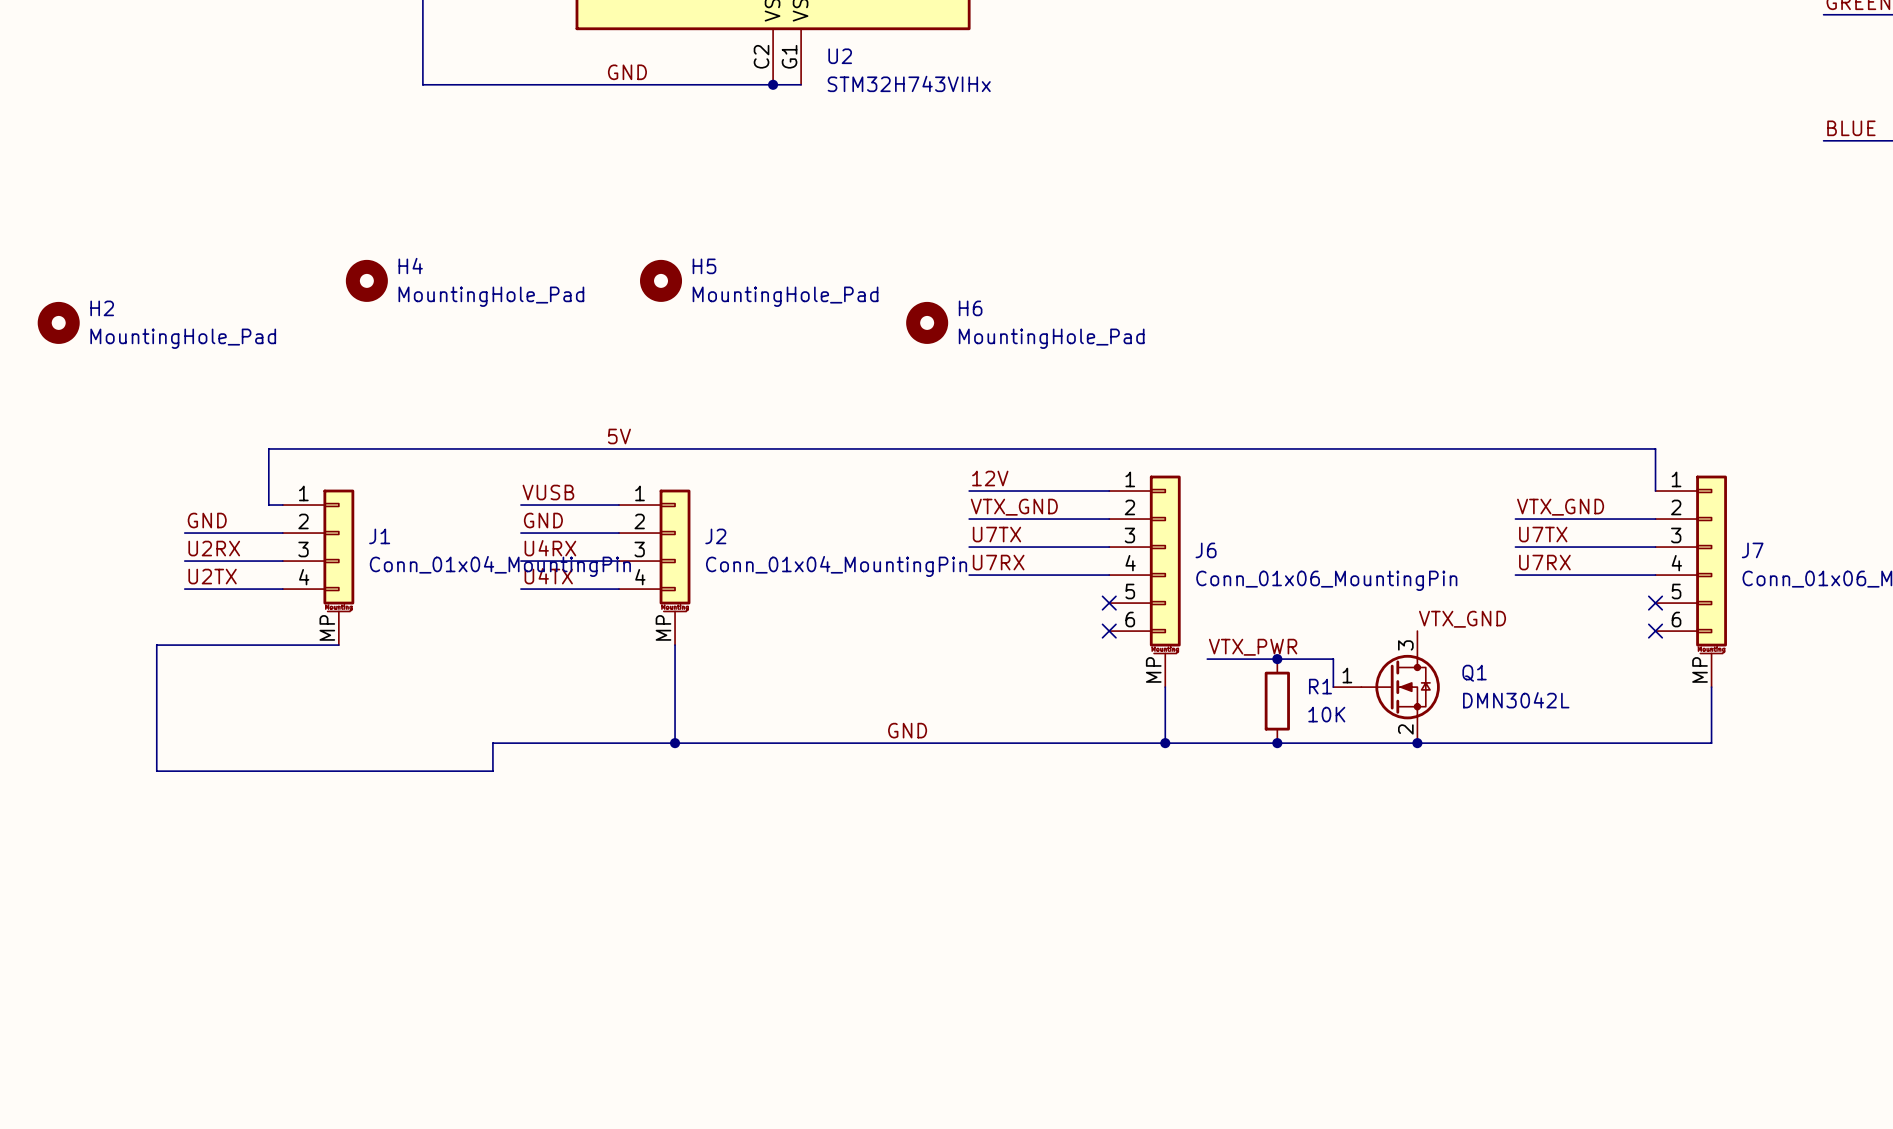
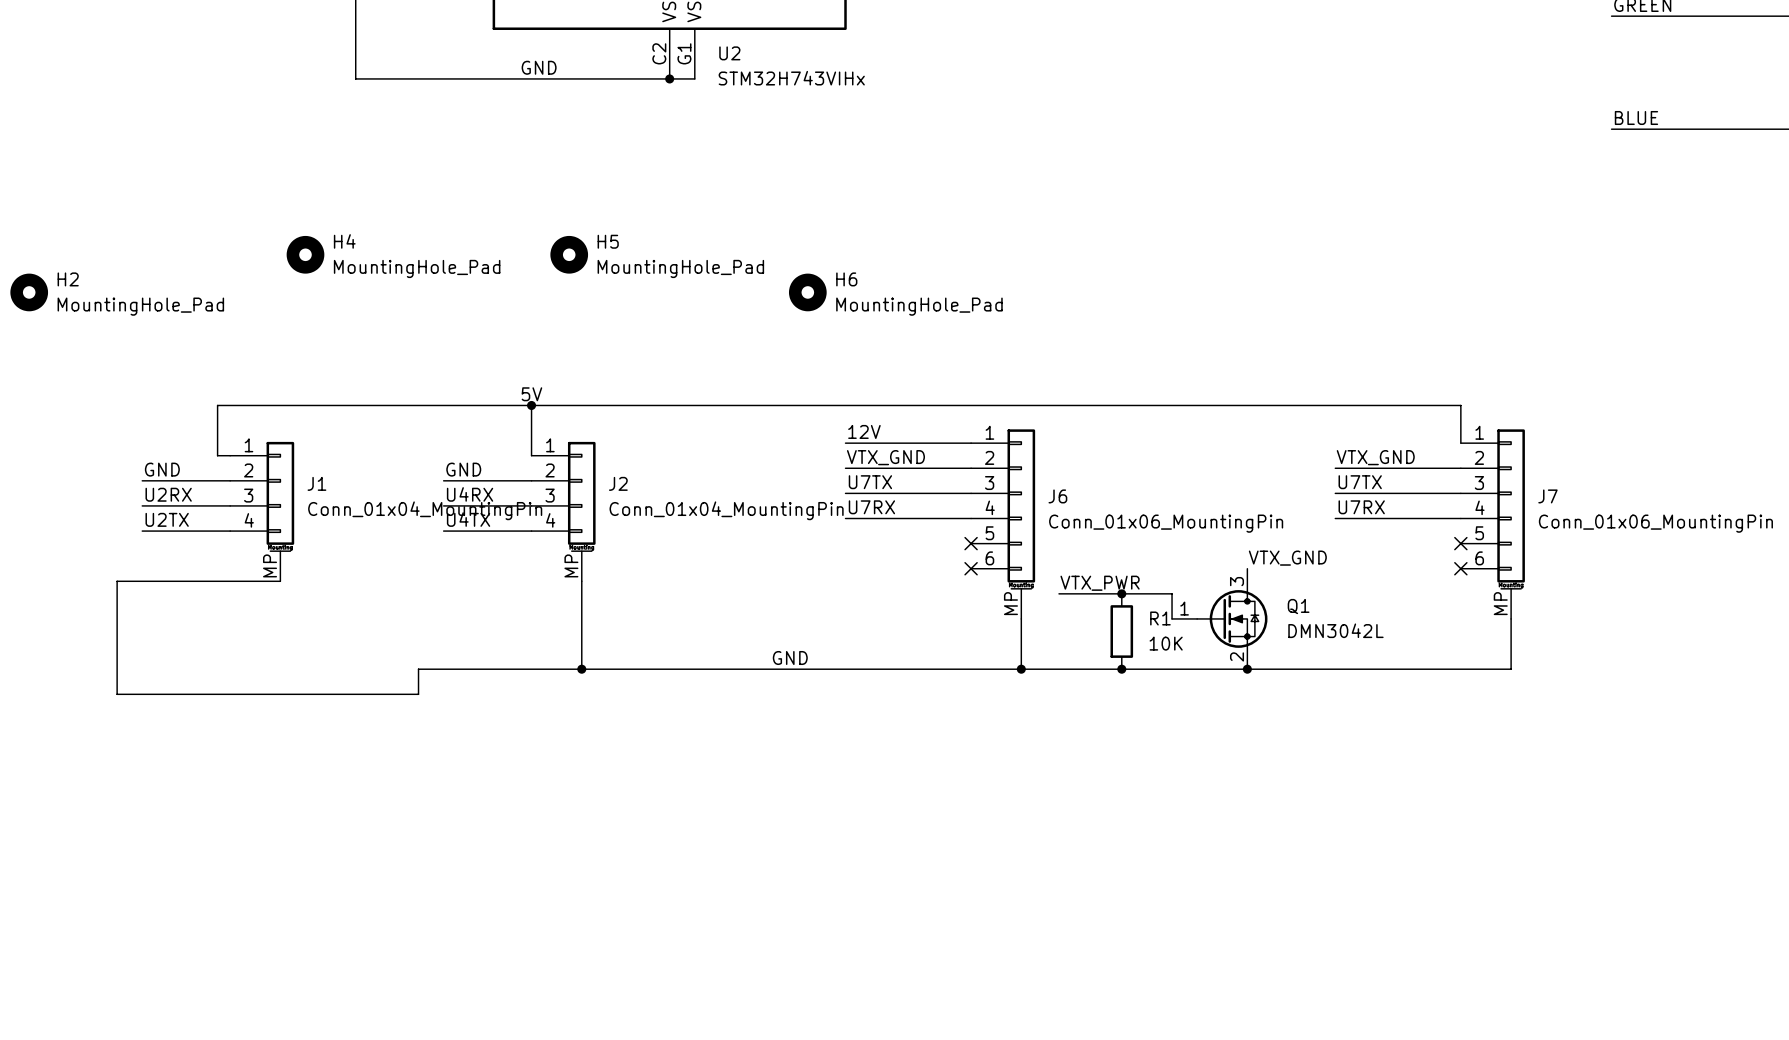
junction: none -> (531, 405)
label: VUSB (548, 492) -> none
wire: (520, 505) (619, 505) -> (531, 405) (531, 455)

